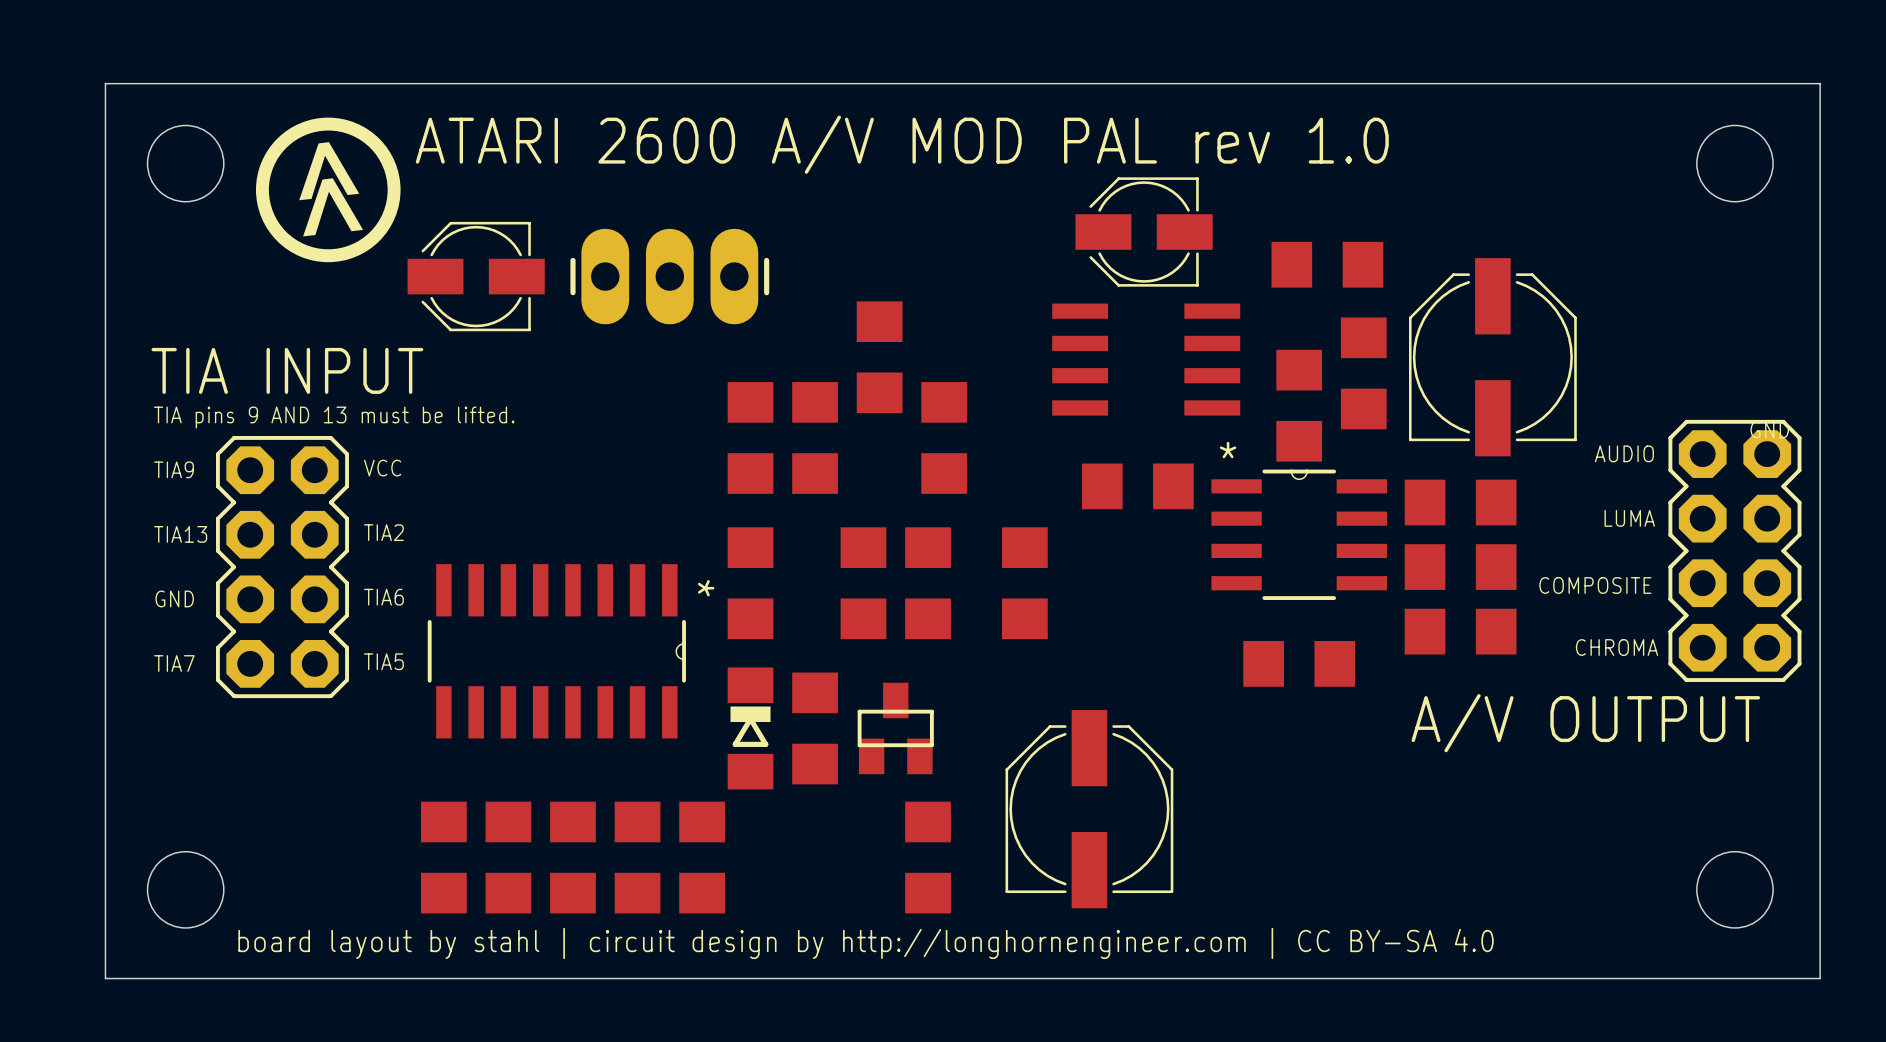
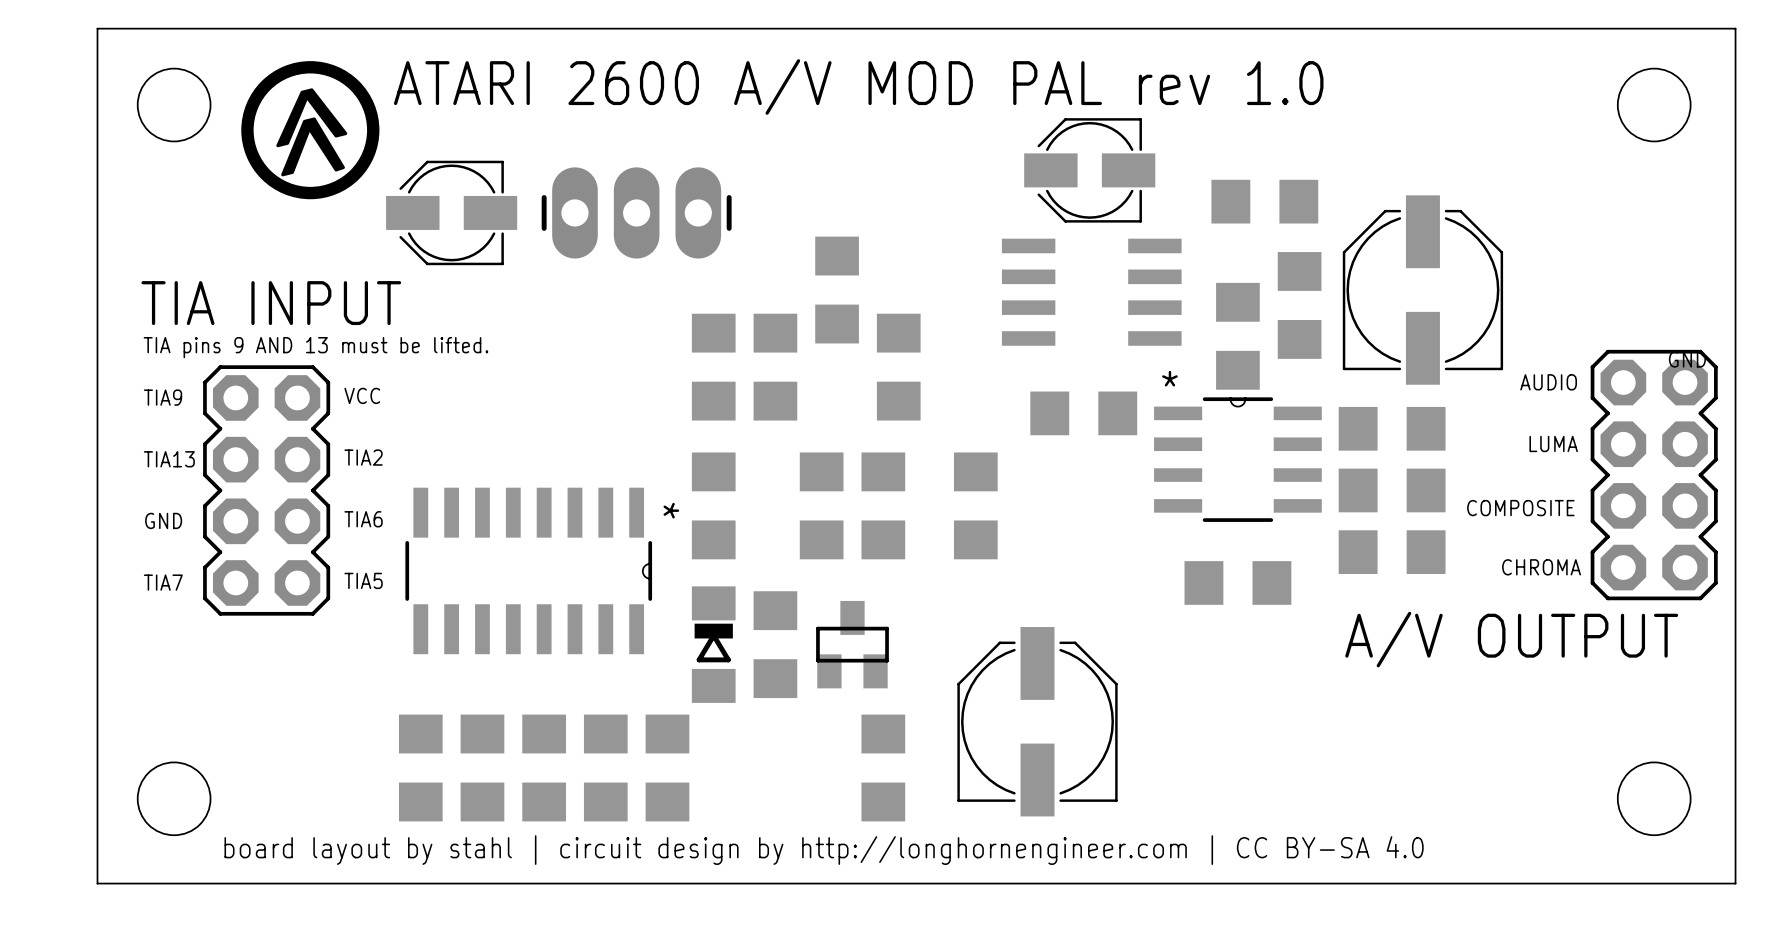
drawing shape: [255, 117, 401, 263] -> [241, 61, 380, 200]

